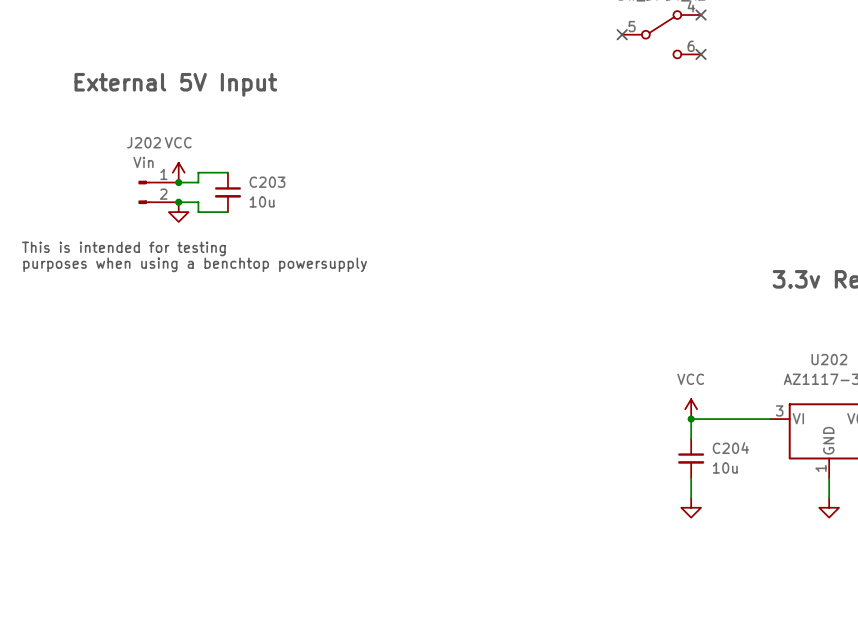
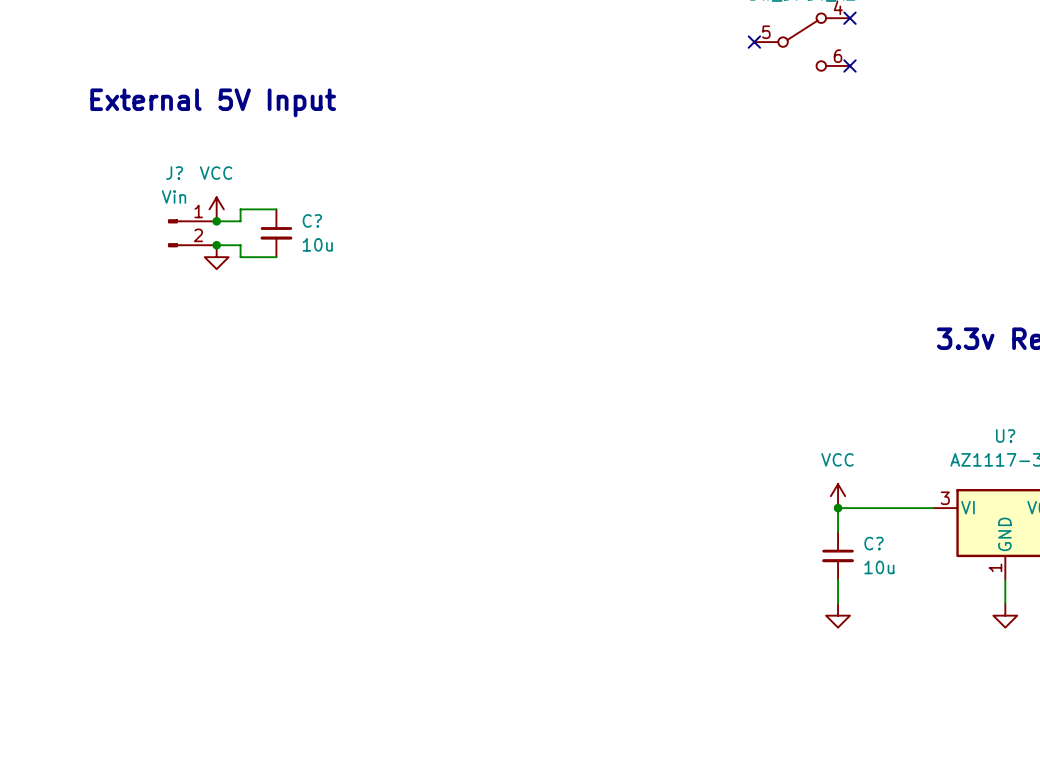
J202 name: J202 (143, 142) -> J? (174, 173)
C203 name: C203 (267, 182) -> C? (312, 220)
text: This is intended for testing (123, 248) -> none
text: purposes when using a benchtop powersupply (195, 264) -> none
U202 name: U202 (829, 359) -> U? (1005, 435)
C204 name: C204 (730, 448) -> C? (873, 543)

